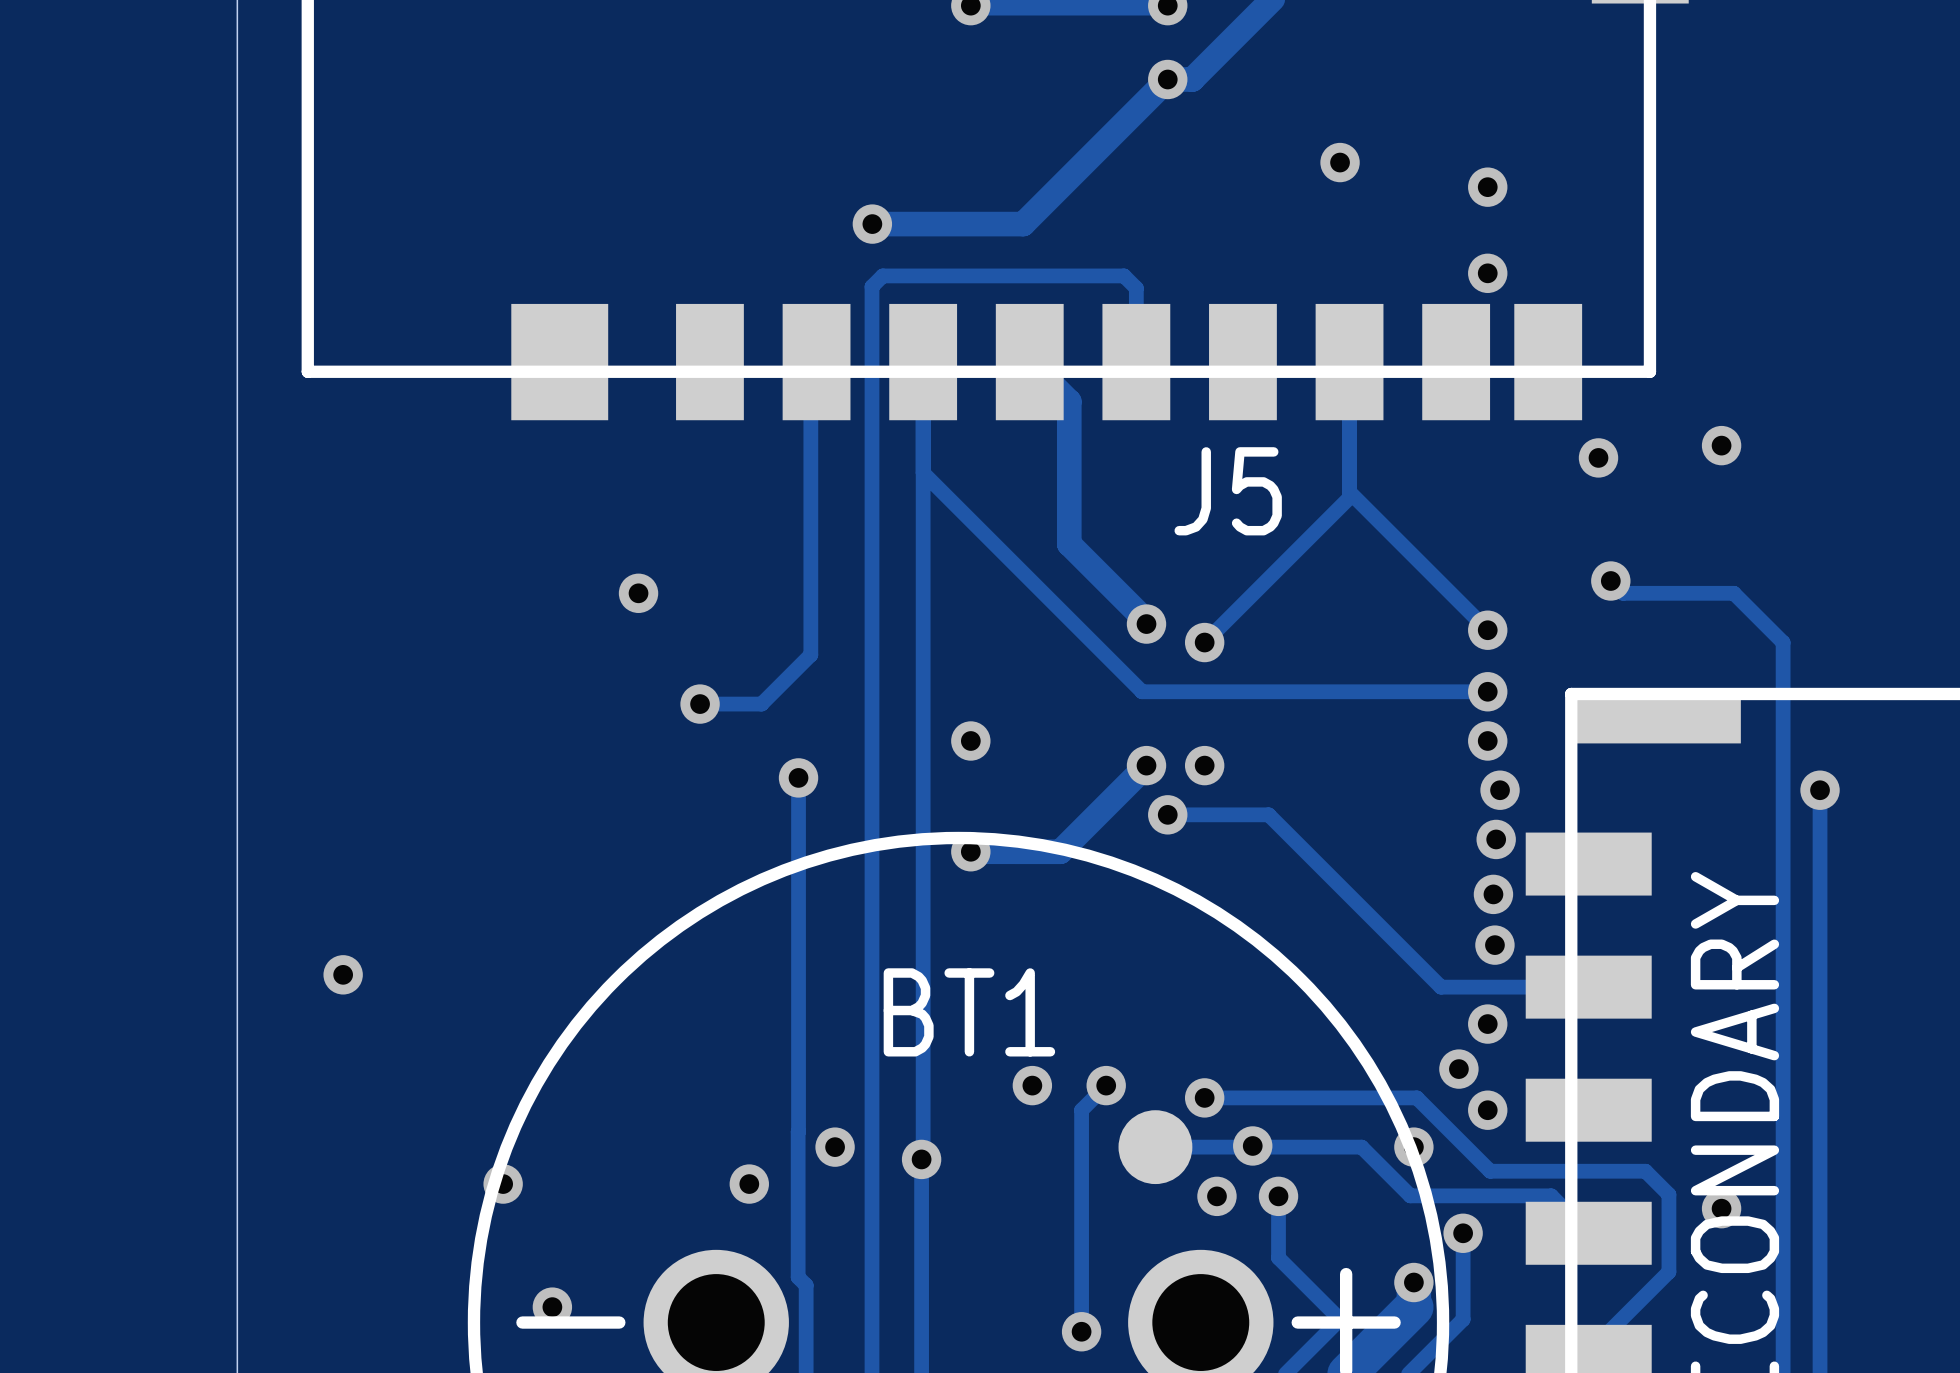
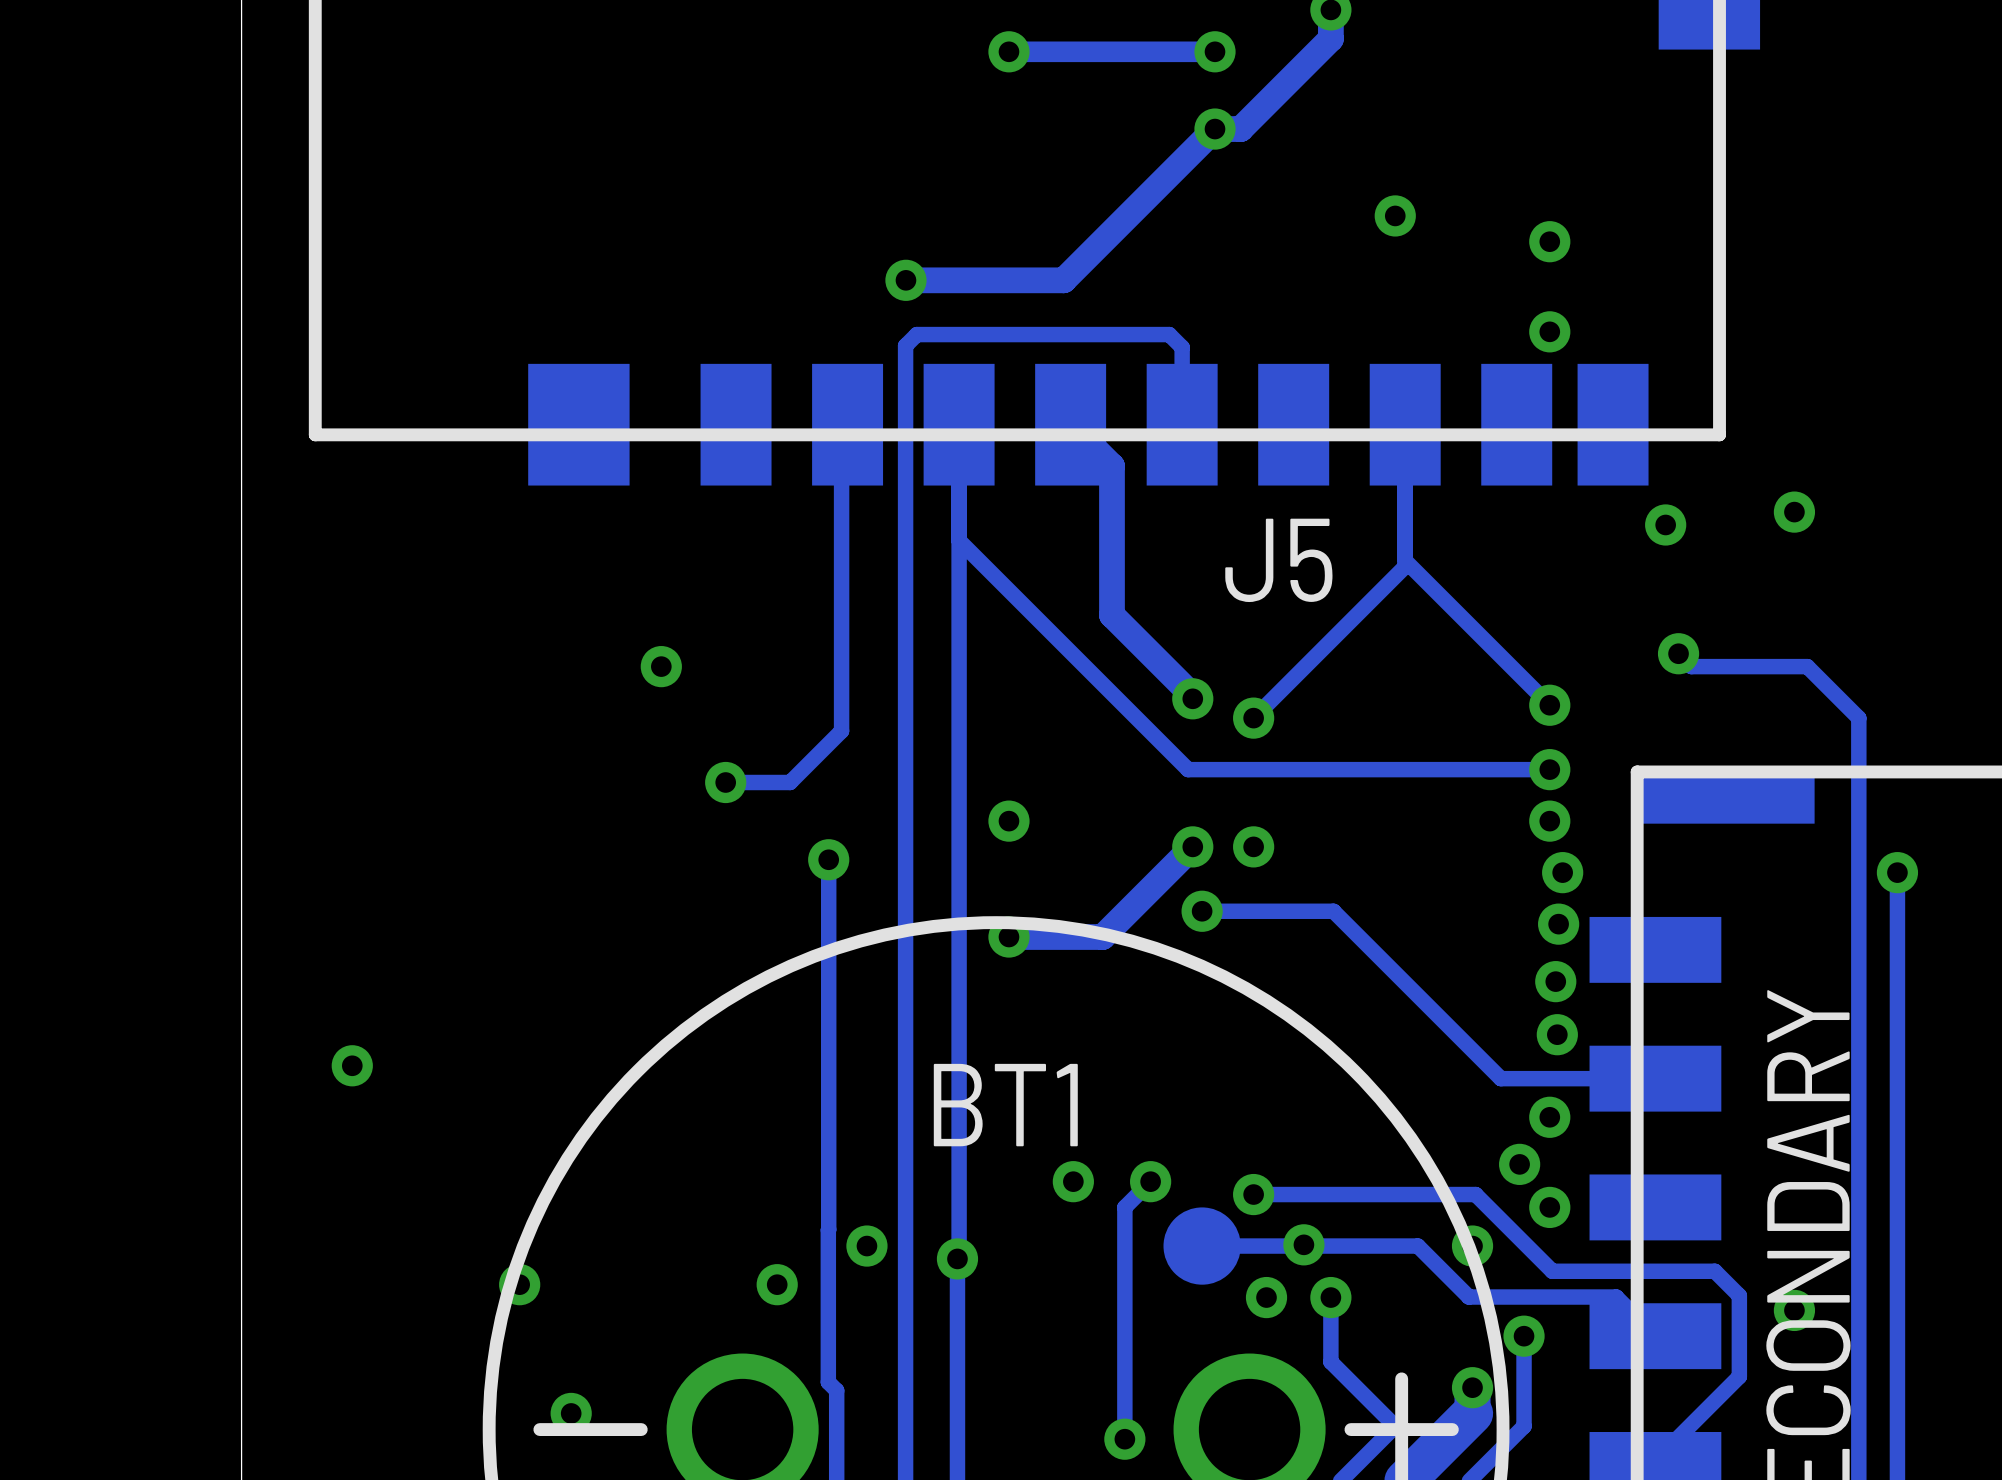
track: (1167, 814) (1268, 814) (1281, 827) -> (1202, 911) (1333, 911)
via position: (1167, 814) -> (1202, 911)

